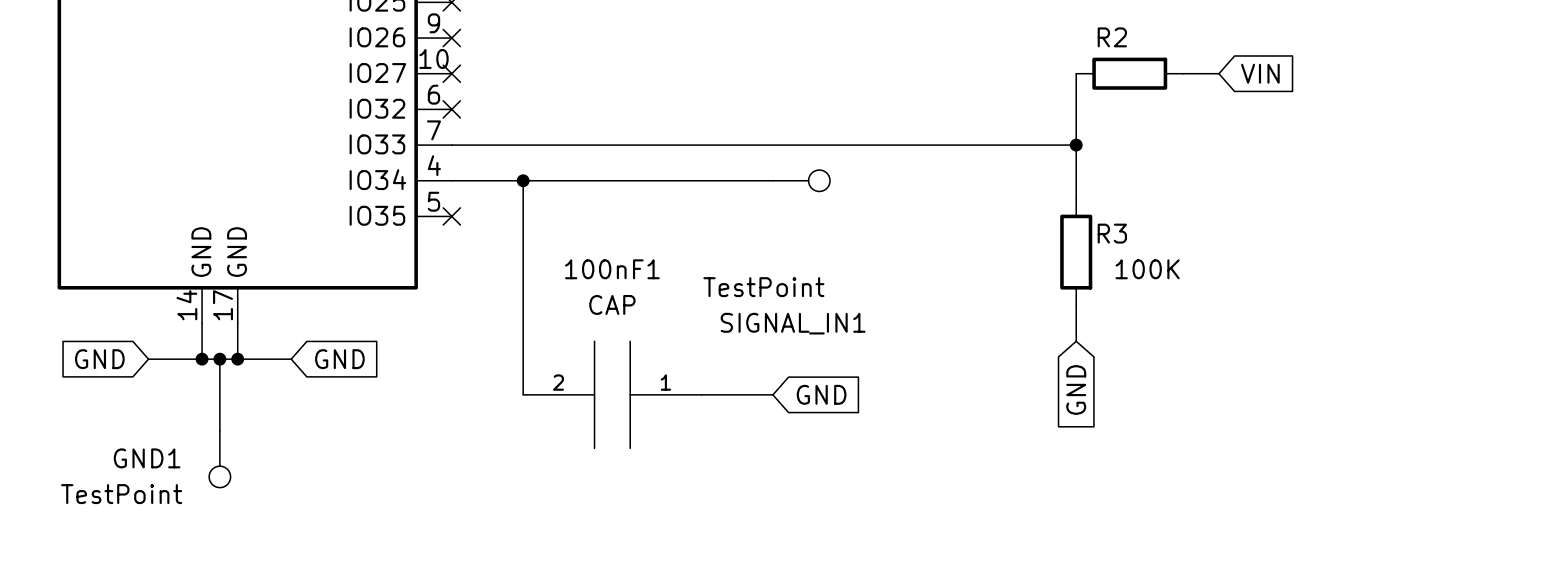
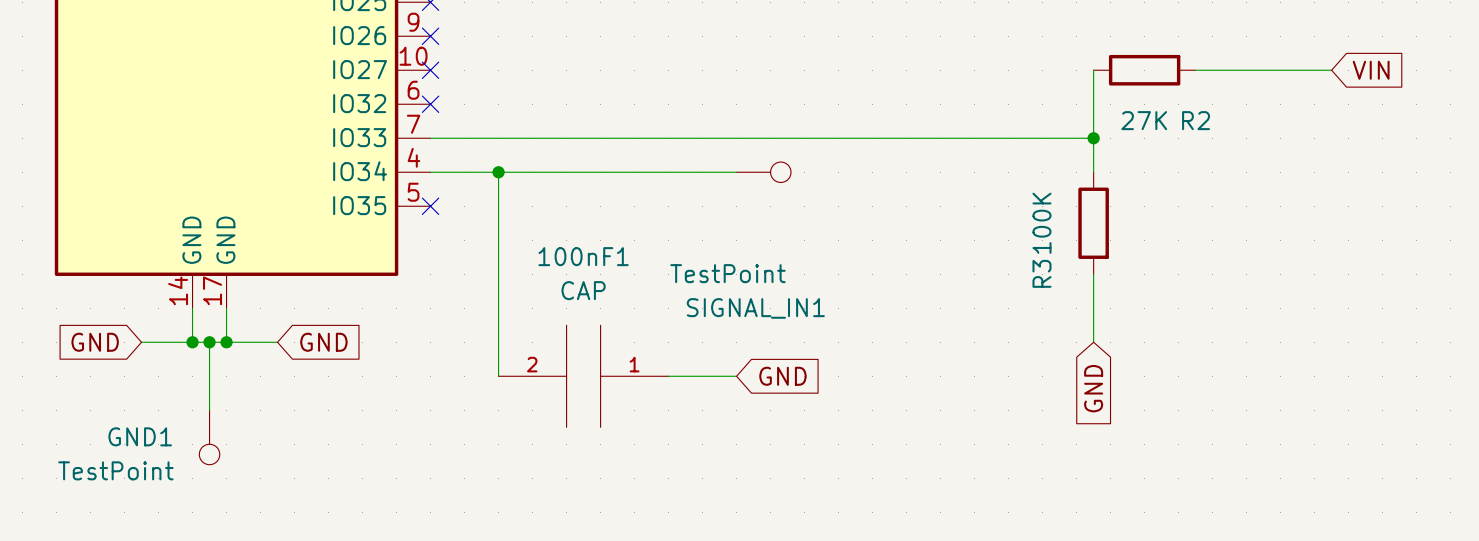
R2 name position: R2 (1112, 37) -> R2 (1196, 120)
wire: (1076, 73) (1076, 198) -> none
R2 position: (1129, 73) -> (1144, 70)
wire: none -> (1093, 70) (1093, 172)
wire: (1183, 73) (1218, 73) -> none
wire: none -> (1195, 70) (1331, 70)
global label position: VIN (1260, 73) -> VIN (1371, 70)
R2 value: none -> 27K (1144, 120)
wire: none -> (1025, 138) (1093, 138)
junction position: (1076, 145) -> (1093, 138)
R3 name rotation: 0° (1112, 233) -> 90° counterclockwise (1041, 273)
R3 name position: R3 (1112, 233) -> R3 (1041, 273)
R3 position: (1076, 252) -> (1093, 223)
R3 value rotation: 0° (1147, 269) -> 90° counterclockwise (1041, 223)
wire: none -> (1093, 274) (1093, 342)
wire: (1076, 305) (1076, 341) -> none
global label position: GND (1076, 389) -> GND (1093, 388)

